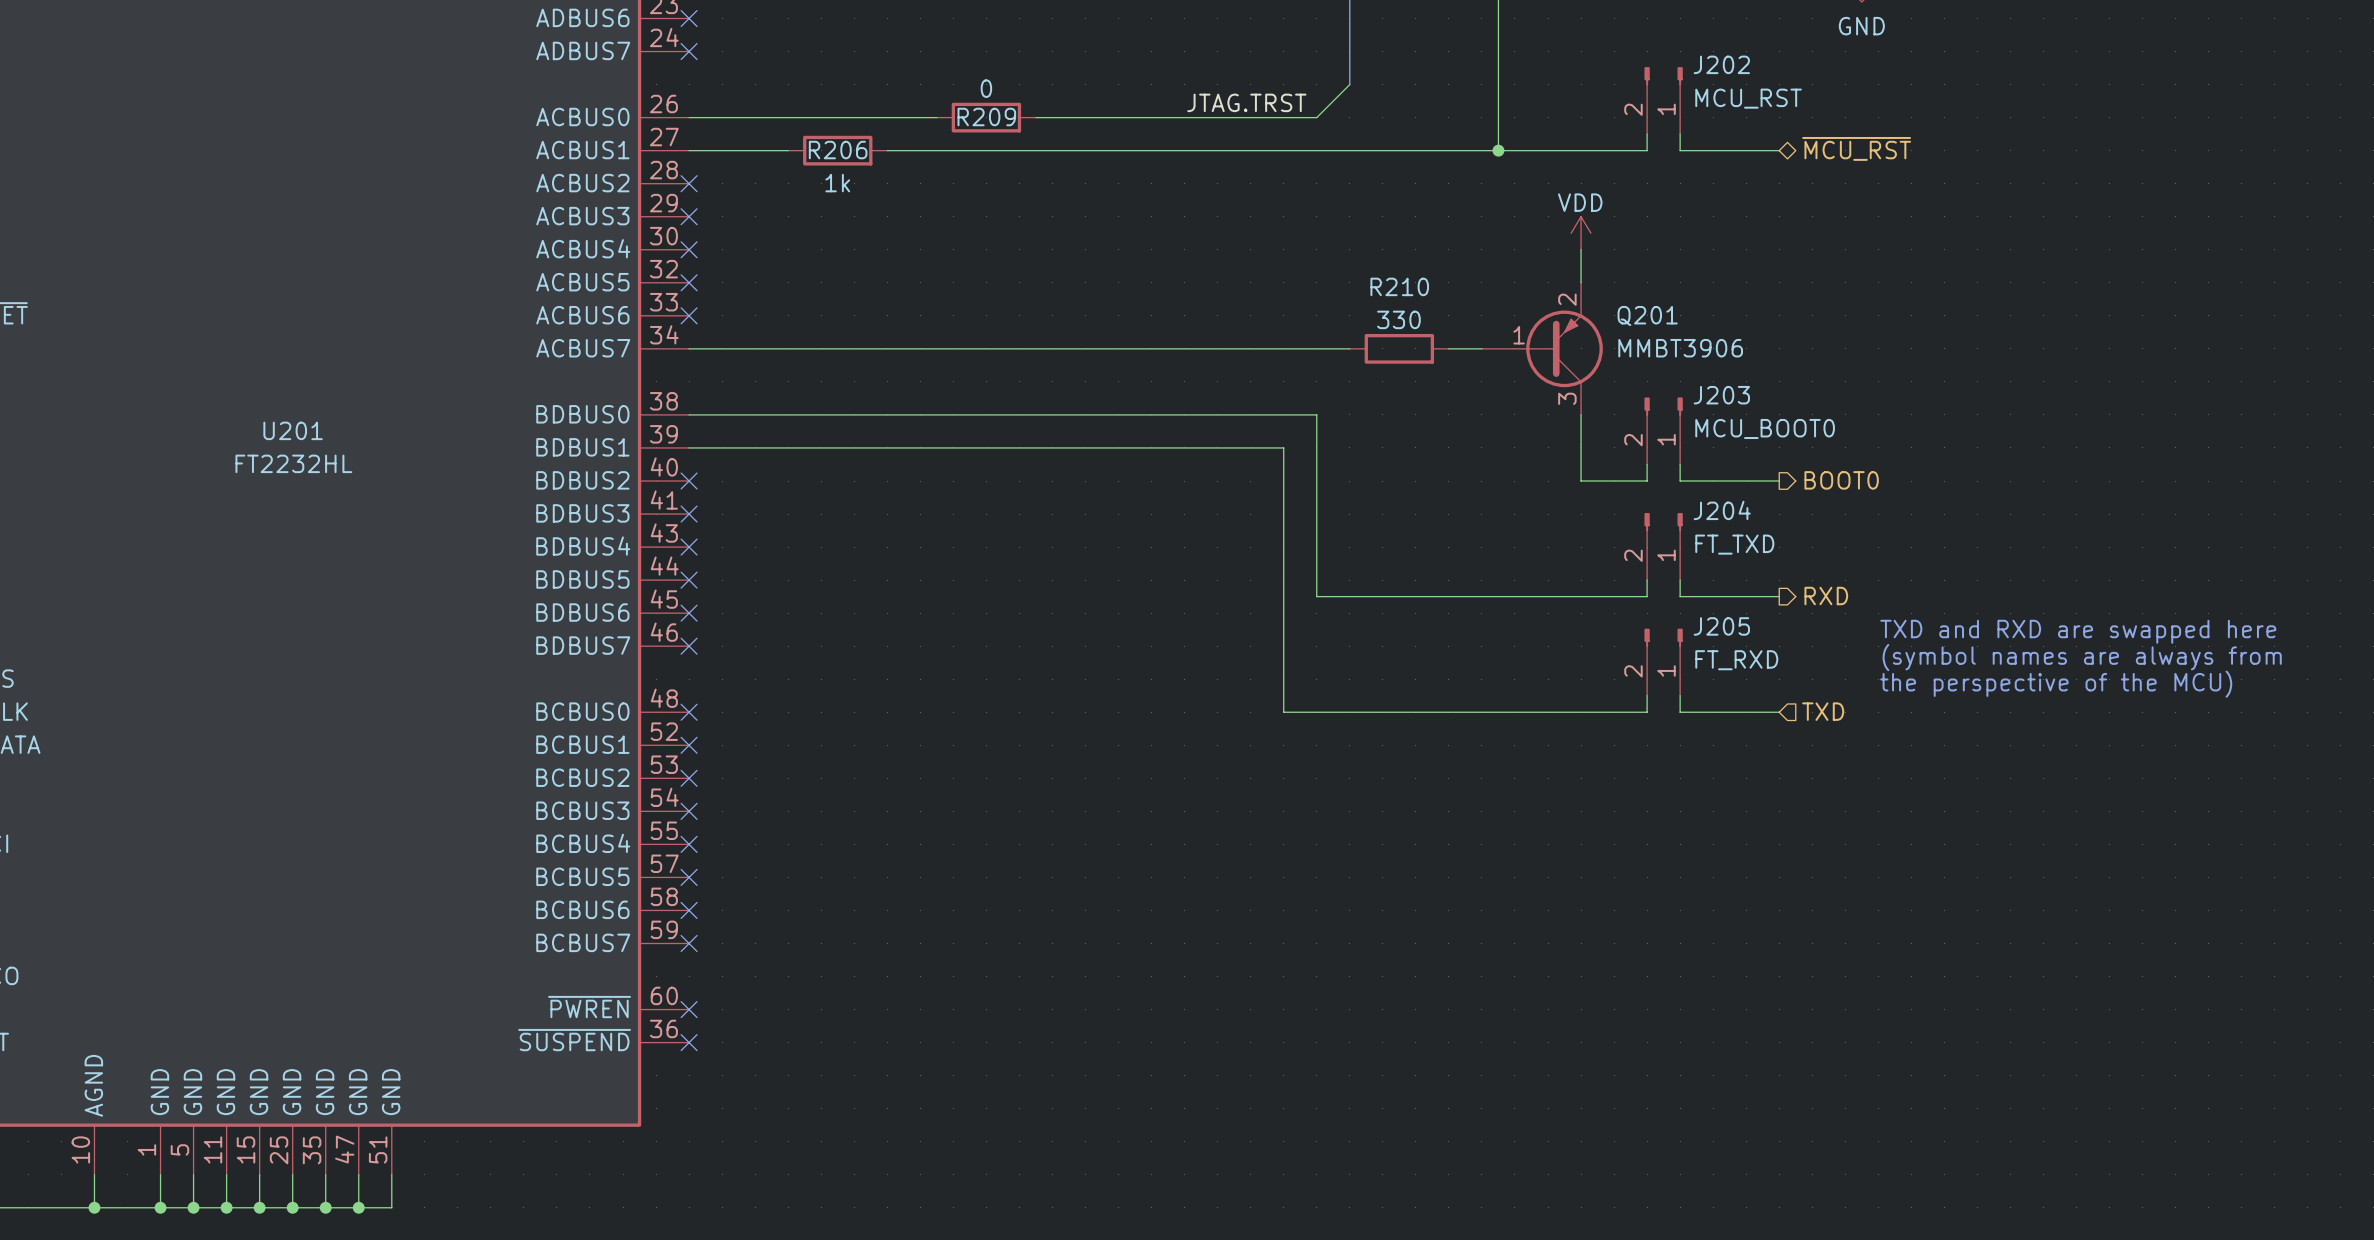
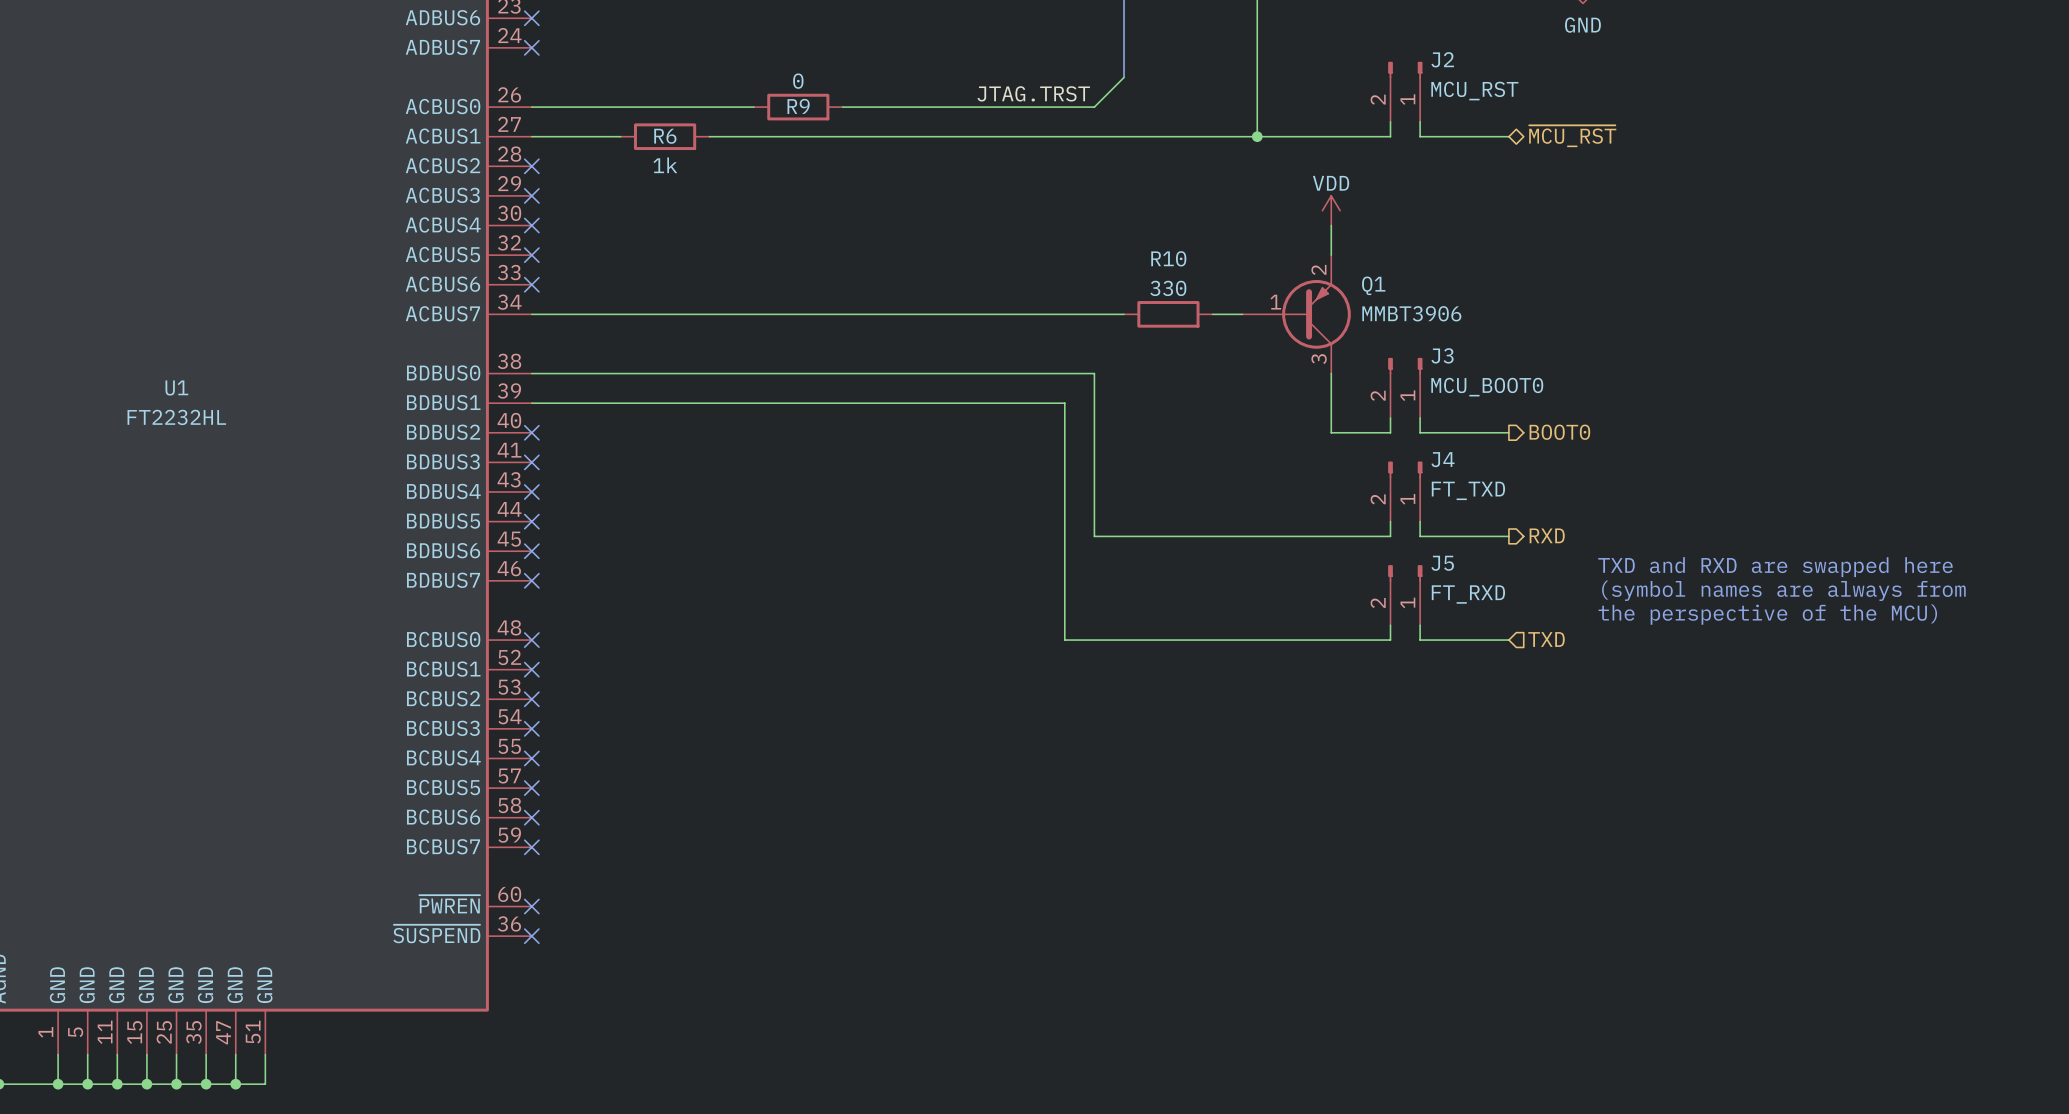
J202 name: J202 (1721, 64) -> J2 (1442, 59)
R209 name: R209 (986, 117) -> R9 (798, 106)
R206 name: R206 (838, 150) -> R6 (665, 136)
R210 name: R210 (1399, 286) -> R10 (1168, 258)
Q201 name: Q201 (1647, 315) -> Q1 (1373, 285)
J203 name: J203 (1721, 395) -> J3 (1442, 355)
U201 name: U201 (293, 430) -> U1 (176, 387)
J204 name: J204 (1722, 510) -> J4 (1442, 459)
J205 name: J205 (1721, 626) -> J5 (1442, 563)

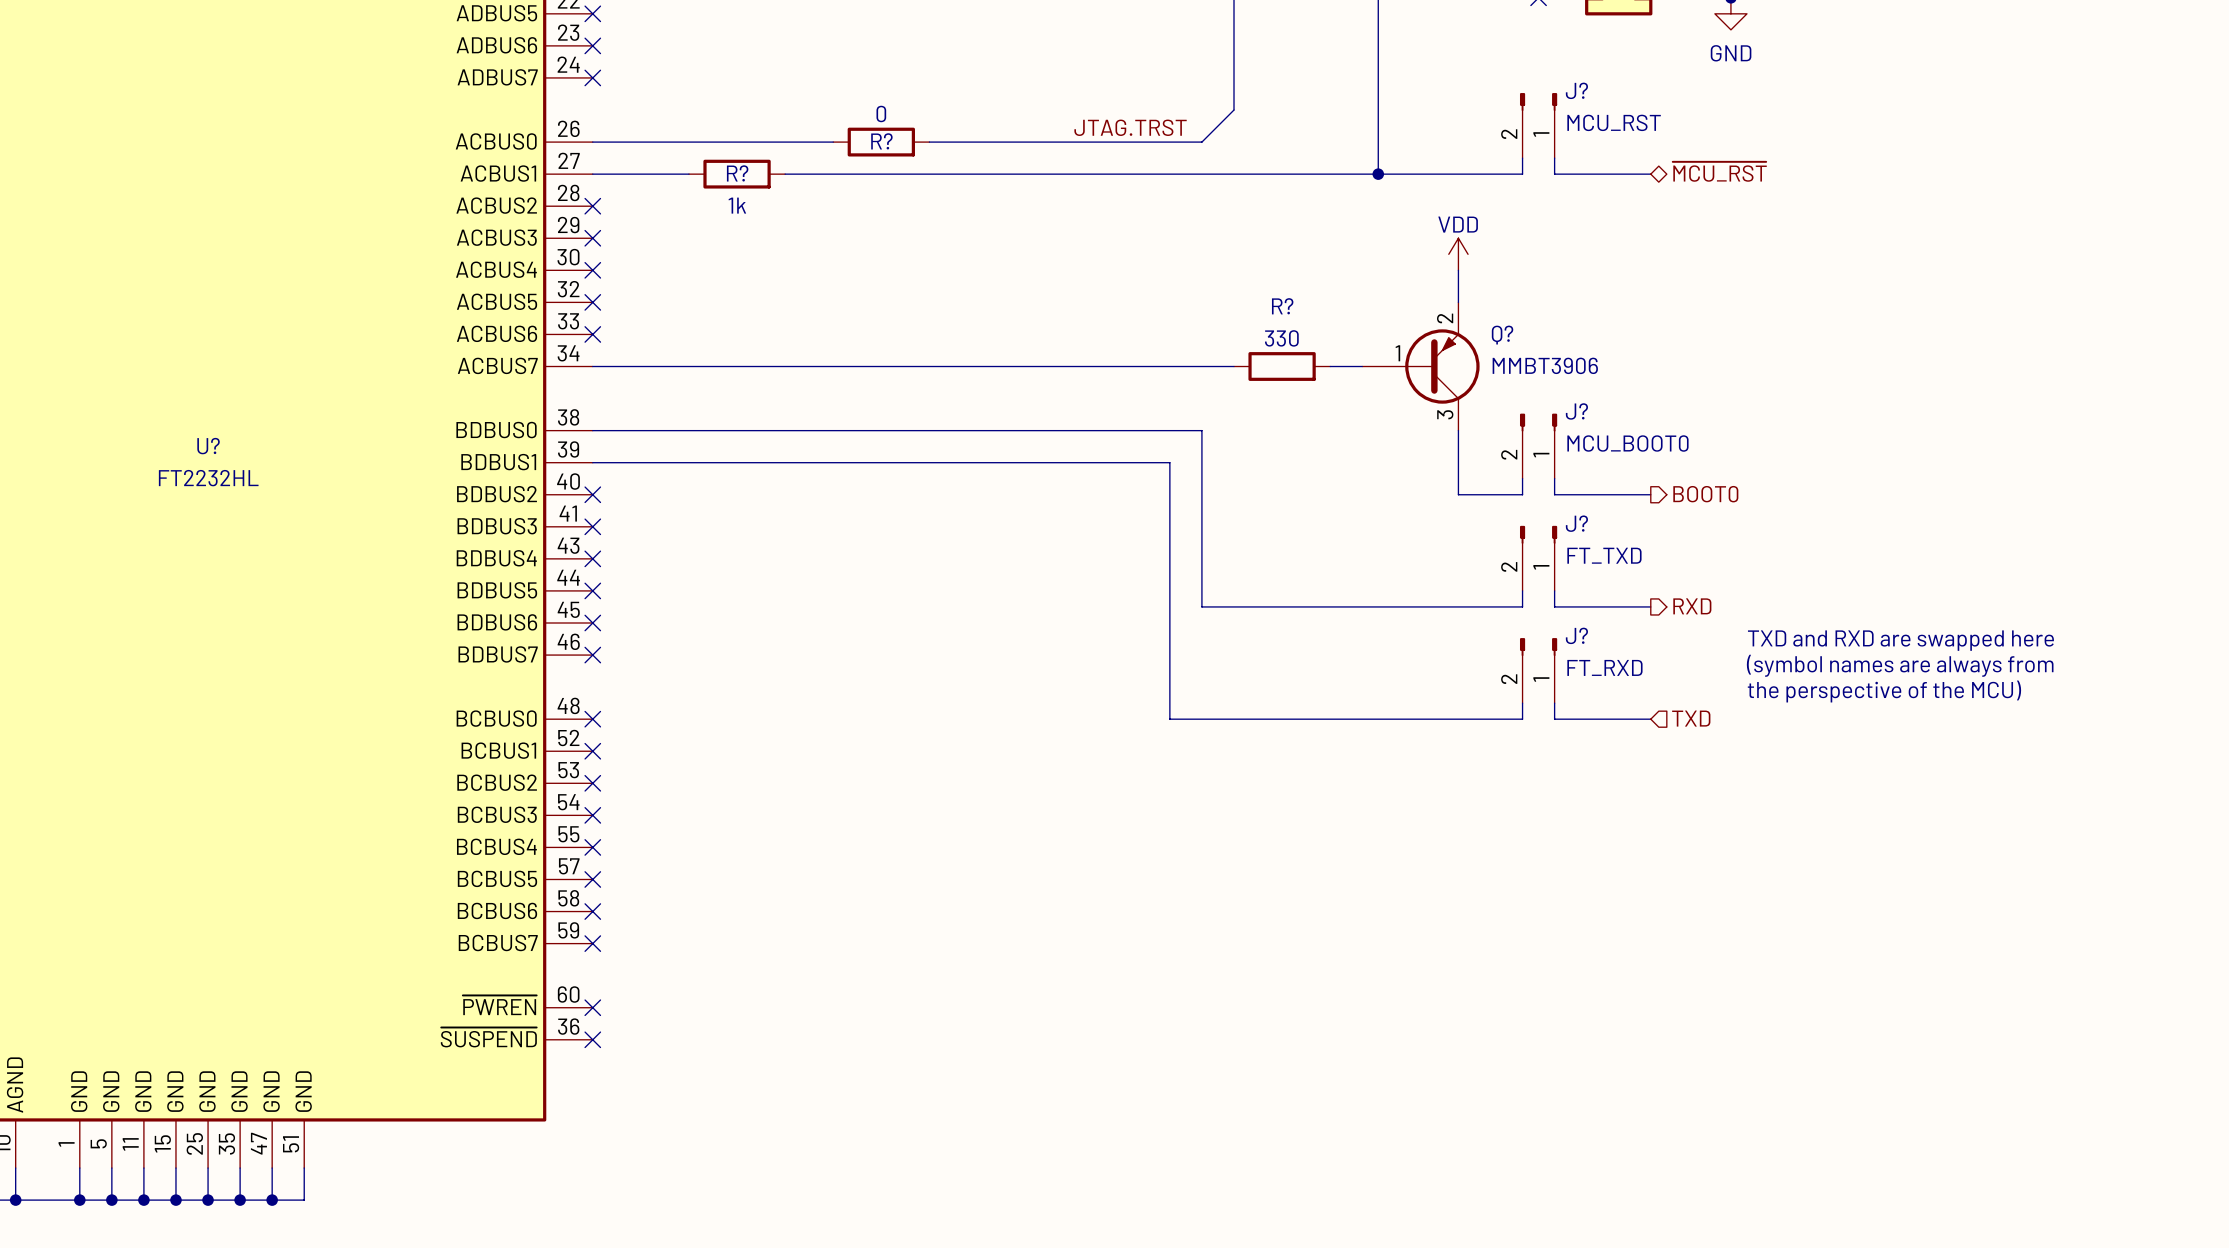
J2 name: J2 (1442, 59) -> J? (1576, 90)
R9 name: R9 (798, 106) -> R? (881, 141)
R6 name: R6 (665, 136) -> R? (737, 173)
R10 name: R10 (1168, 258) -> R? (1282, 306)
Q1 name: Q1 (1373, 285) -> Q? (1502, 335)
J3 name: J3 (1442, 355) -> J? (1576, 411)
U1 name: U1 (176, 387) -> U? (208, 446)
J4 name: J4 (1442, 459) -> J? (1576, 523)
J5 name: J5 (1442, 563) -> J? (1576, 635)

